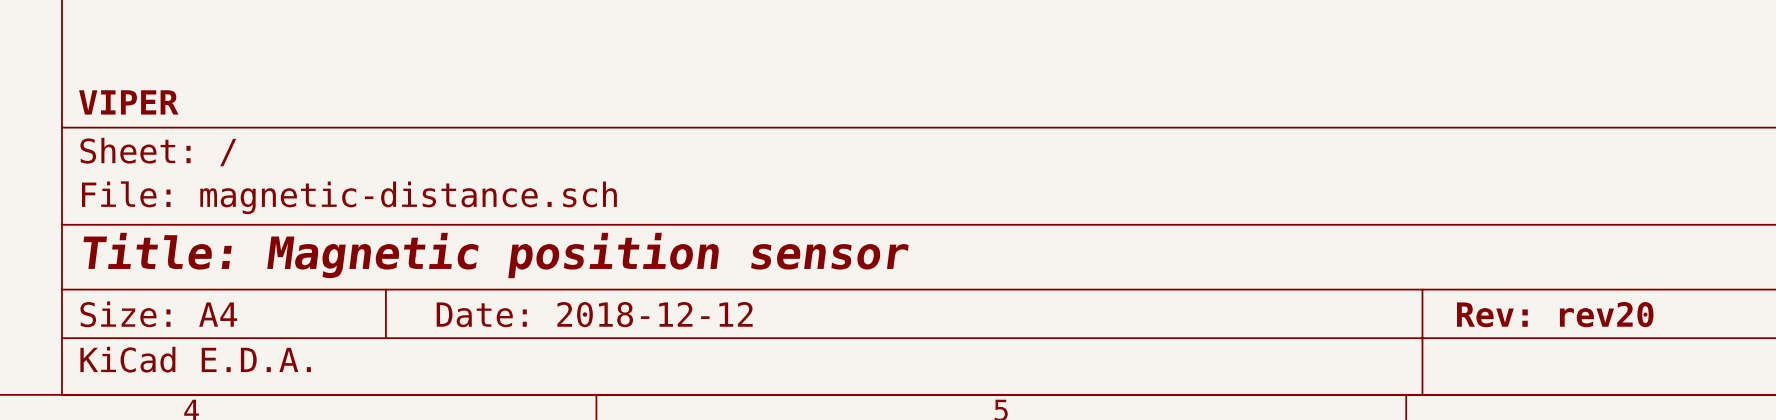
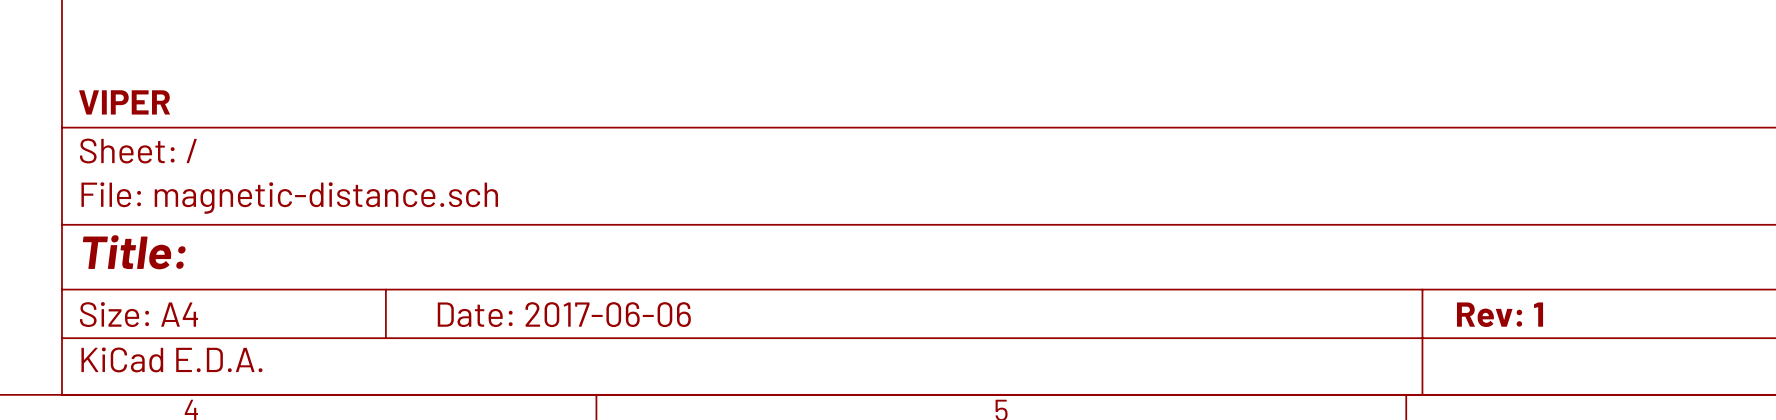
title block: Title: Magnetic position sensor (496, 255) -> Title: (134, 252)
title block: Date: 2018-12-12 (594, 314) -> Date: 2017-06-06 (564, 314)
title block: Rev: rev20 (1555, 314) -> Rev: 1 (1500, 314)

